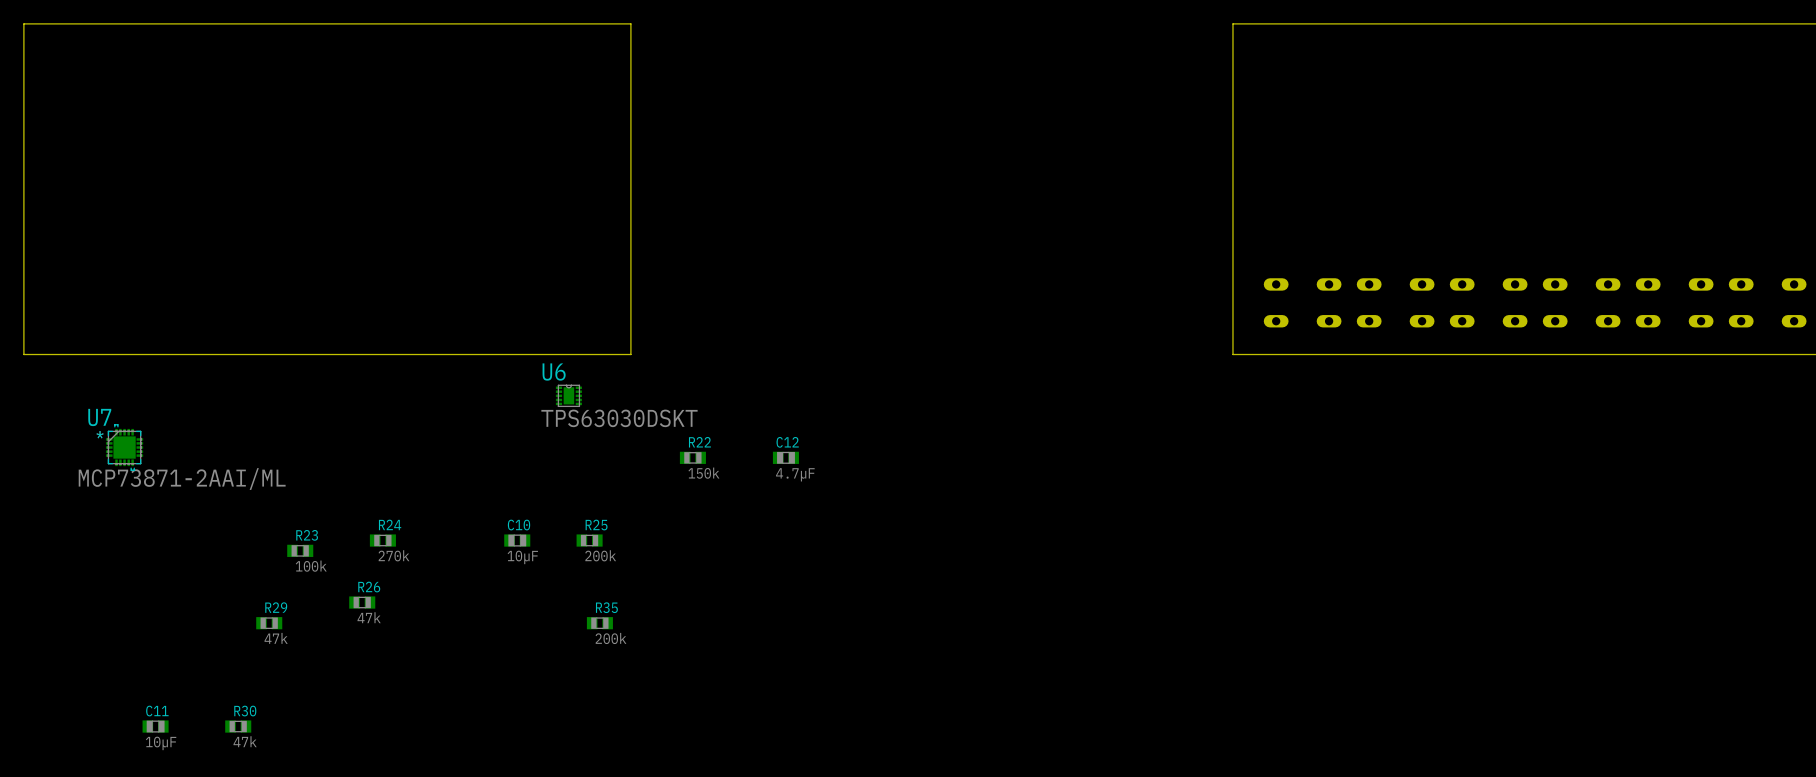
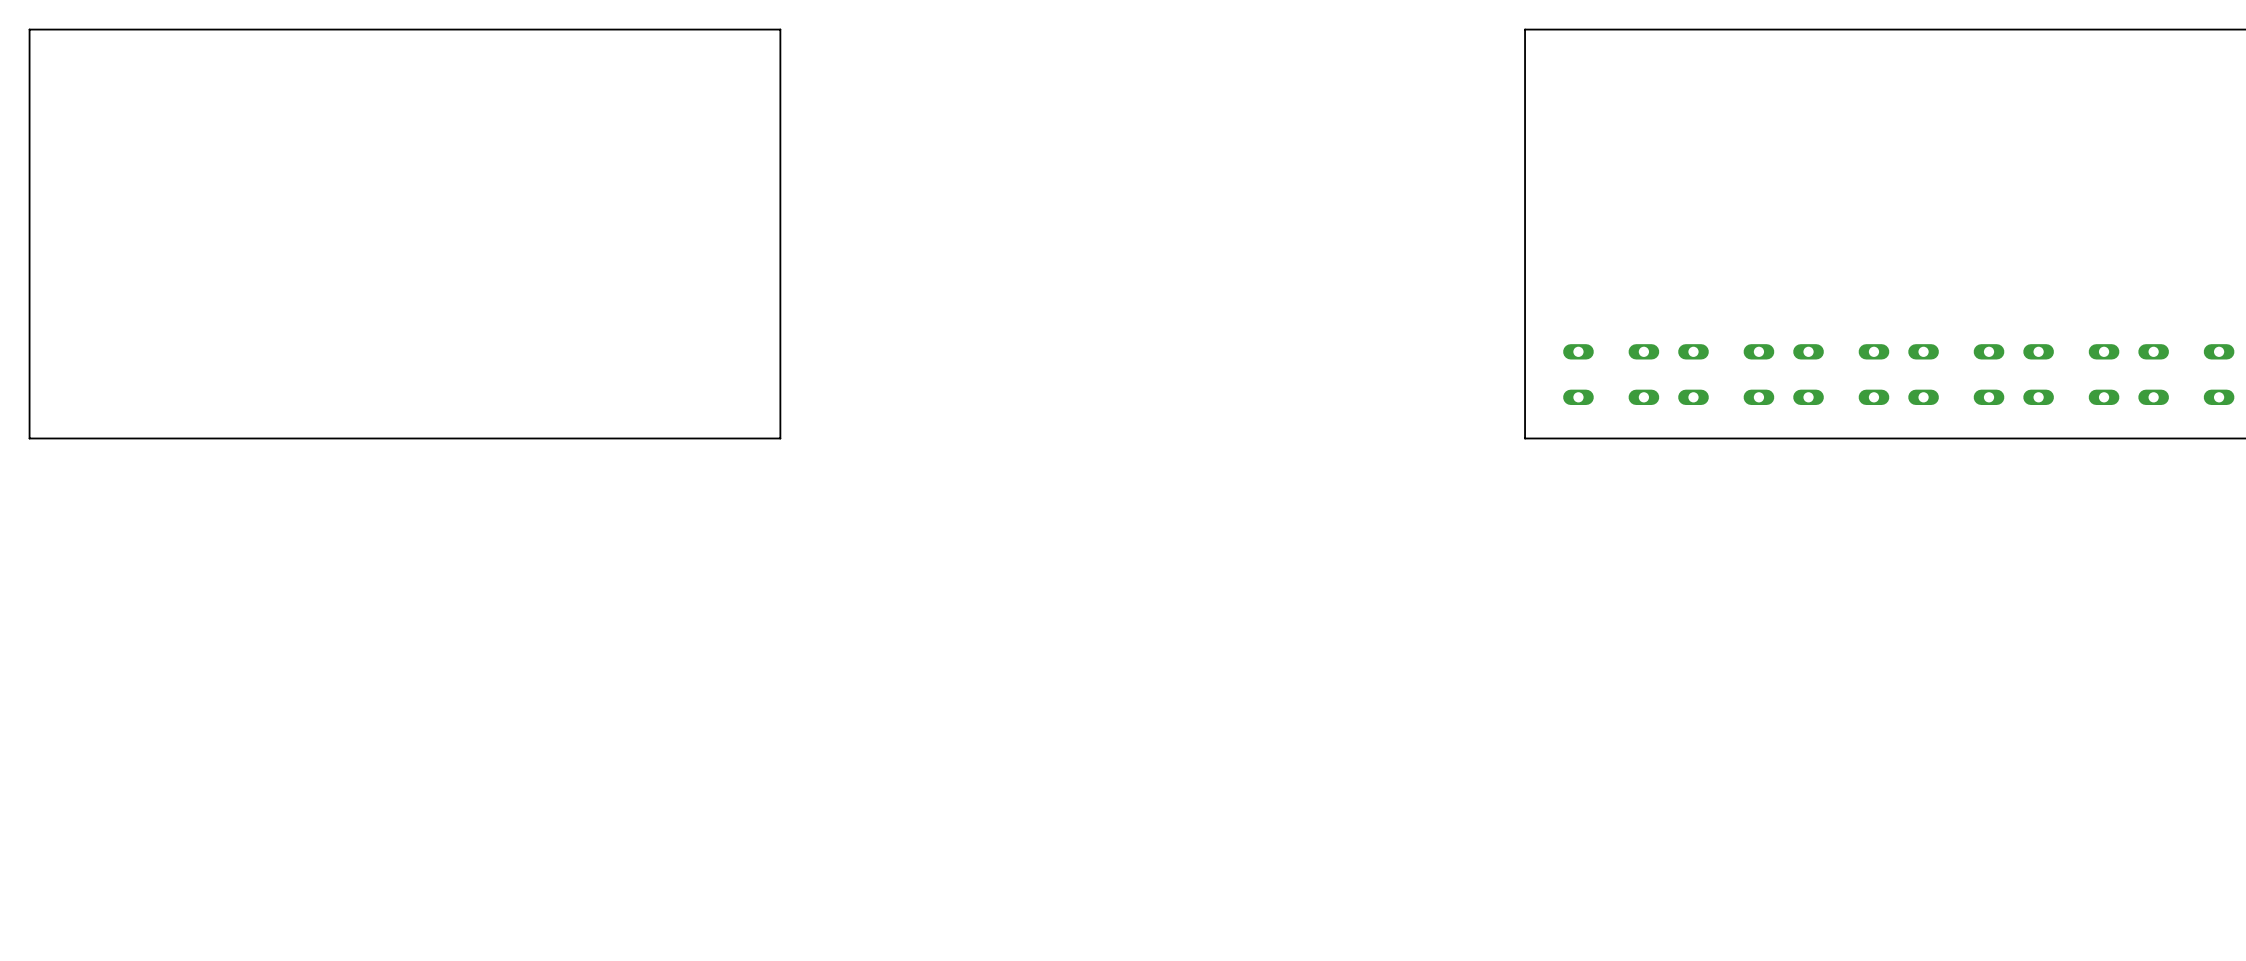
U6: TPS63030DSKT (568, 395) -> none
U7: MCP73871-2AAI/ML (124, 447) -> none
R22: 150k (692, 457) -> none
C12: 4.7µF (785, 457) -> none
R24: 270k (382, 540) -> none
C10: 10µF (517, 540) -> none
R25: 200k (589, 540) -> none
R23: 100k (300, 550) -> none
R26: 47k (362, 602) -> none
R29: 47k (269, 623) -> none
R35: 200k (599, 623) -> none
C11: 10µF (155, 726) -> none
R30: 47k (238, 726) -> none

